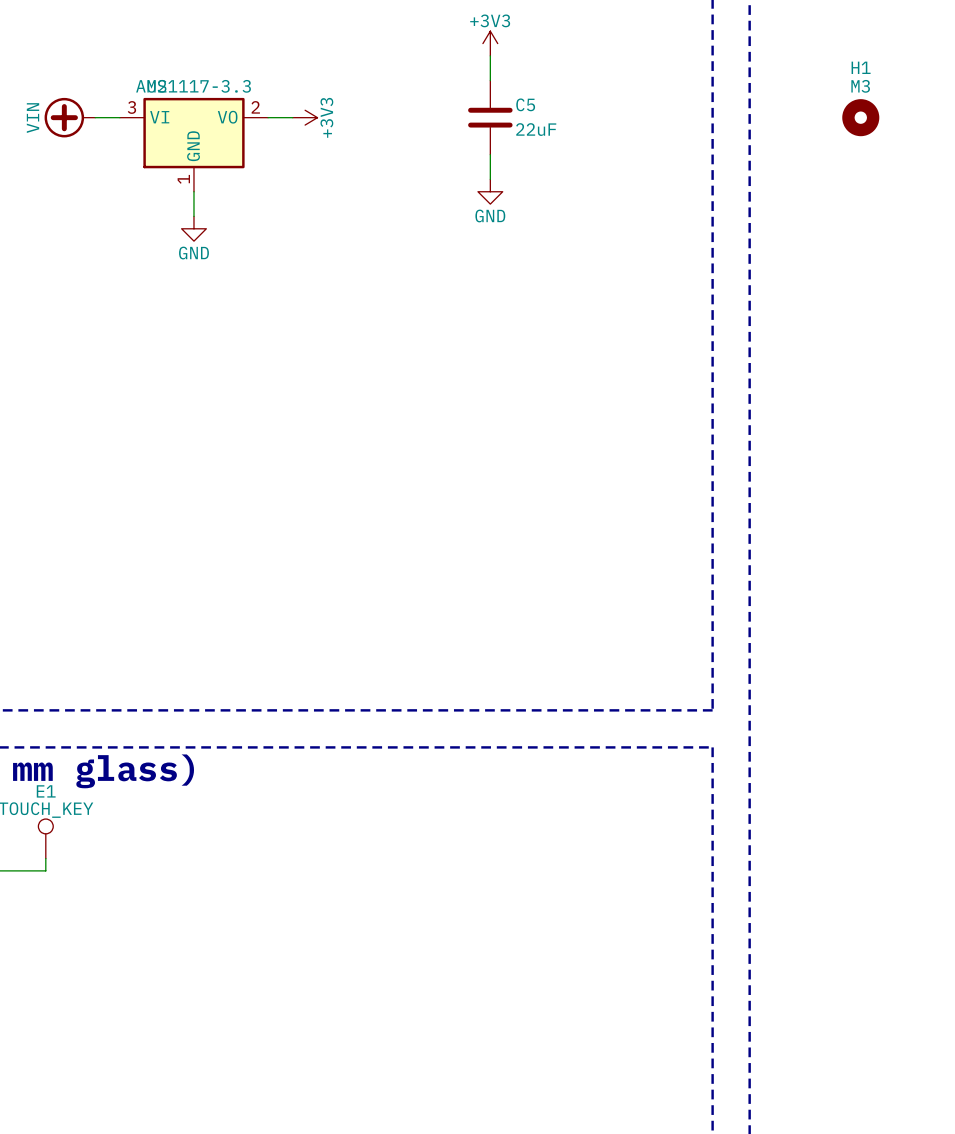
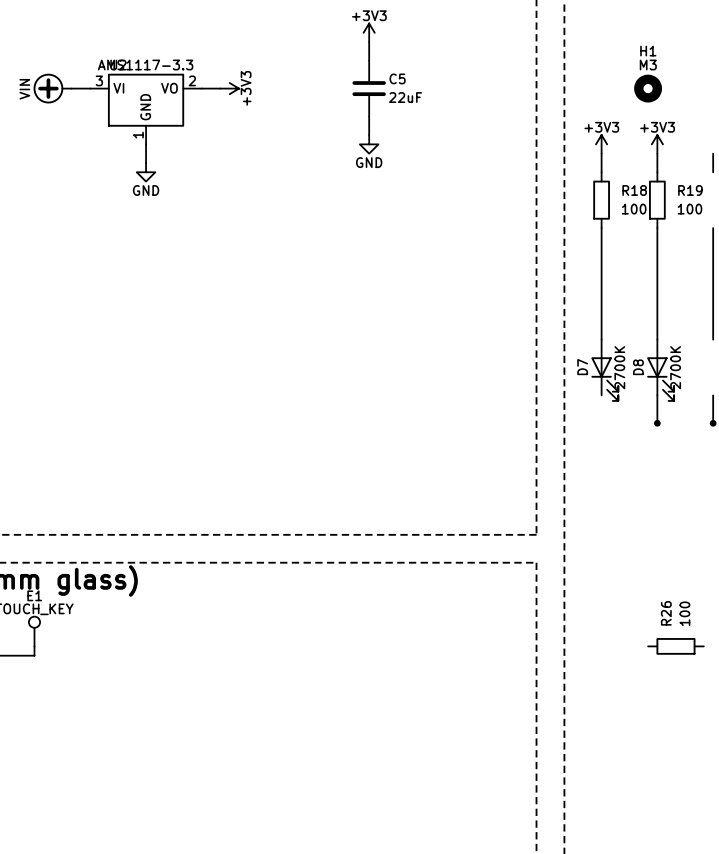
power symbol: none -> +3V3 (601, 144)
power symbol: none -> +3V3 (657, 144)
wire: none -> (601, 153) (601, 172)
wire: none -> (657, 153) (657, 172)
wire: none -> (713, 153) (713, 172)
R18: none -> 100 (601, 200)
R19: none -> 100 (657, 200)
wire: none -> (601, 228) (601, 339)
wire: none -> (657, 228) (657, 339)
wire: none -> (713, 228) (713, 339)
D7: none -> 2700K (604, 370)
D8: none -> 2700K (660, 370)
wire: none -> (657, 395) (657, 423)
wire: none -> (713, 395) (713, 423)
junction: none -> (657, 423)
junction: none -> (713, 423)
R26: none -> 100 (675, 646)

